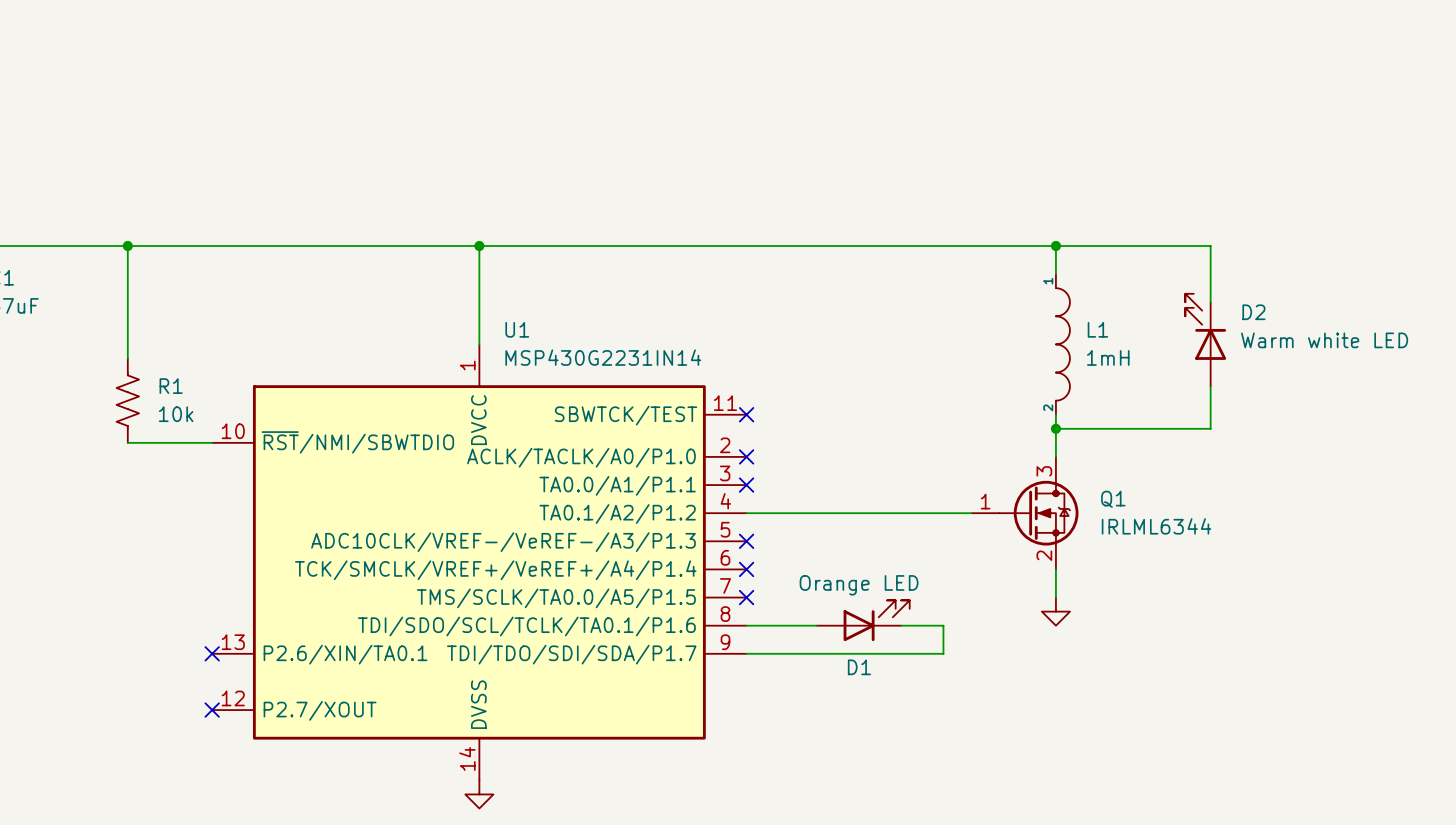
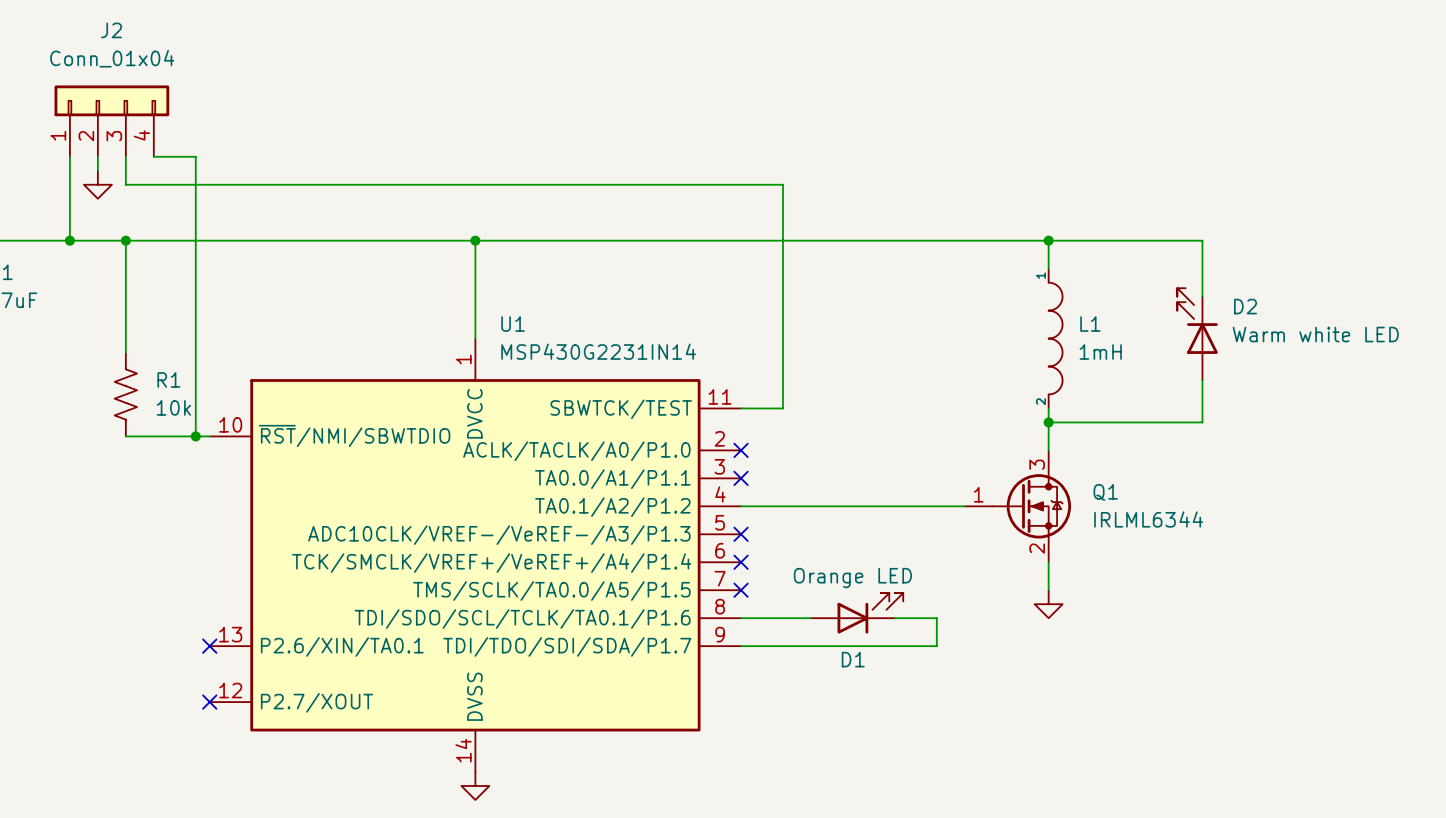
J2: none -> Conn_01x04 (111, 121)
wire: none -> (69, 156) (69, 240)
wire: none -> (97, 156) (97, 170)
wire: none -> (125, 156) (125, 184) (783, 184) (783, 408) (741, 408)
wire: none -> (153, 156) (195, 156) (195, 436)
power symbol: none -> (97, 184)
junction: none -> (69, 240)
no-connect mark: (746, 414) -> none
junction: none -> (195, 436)

